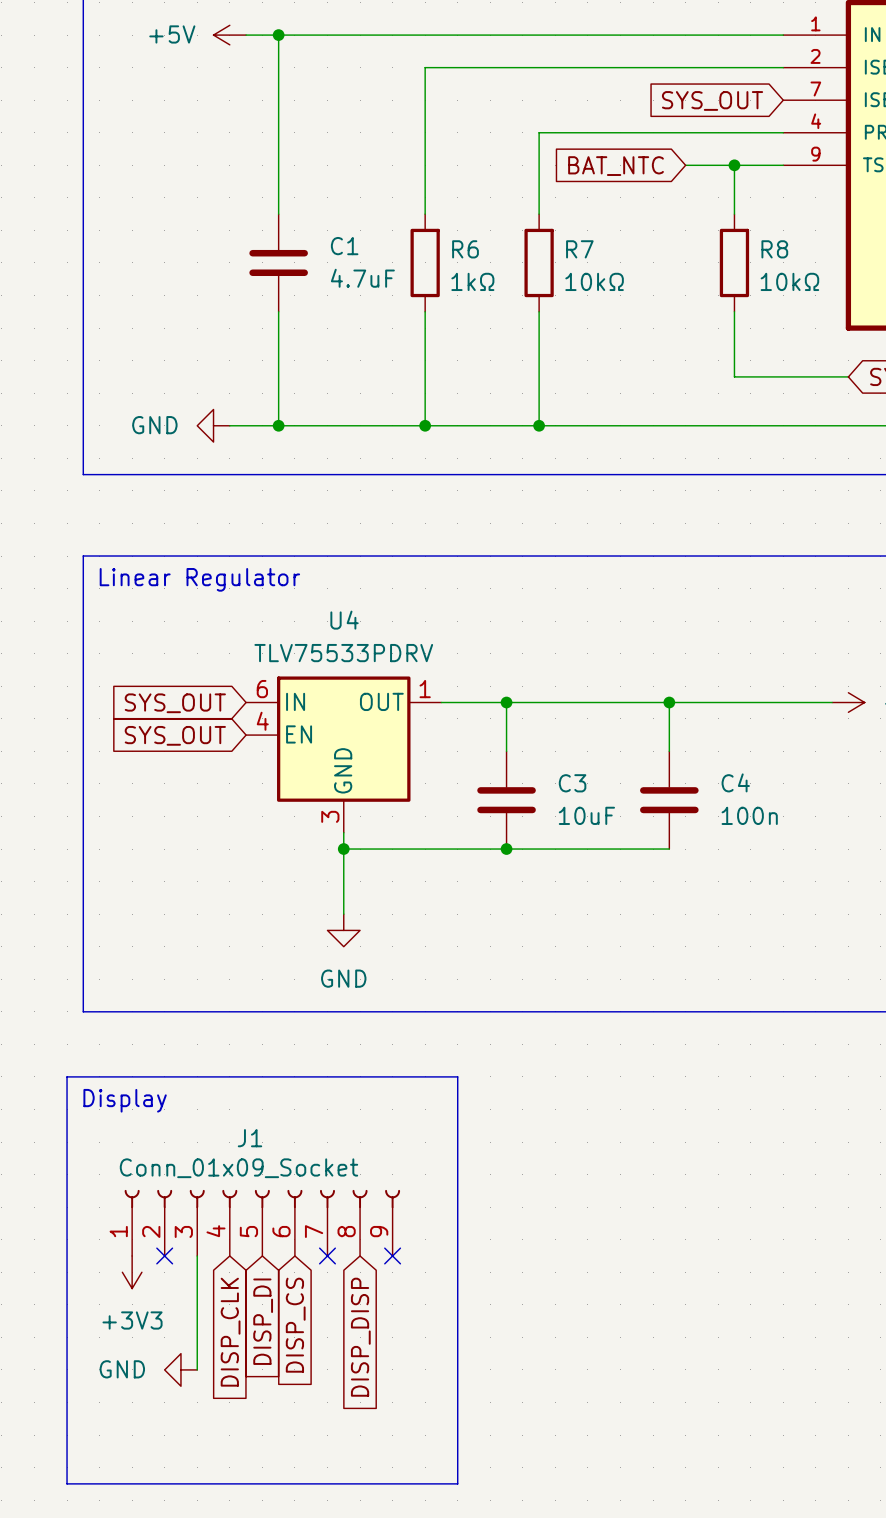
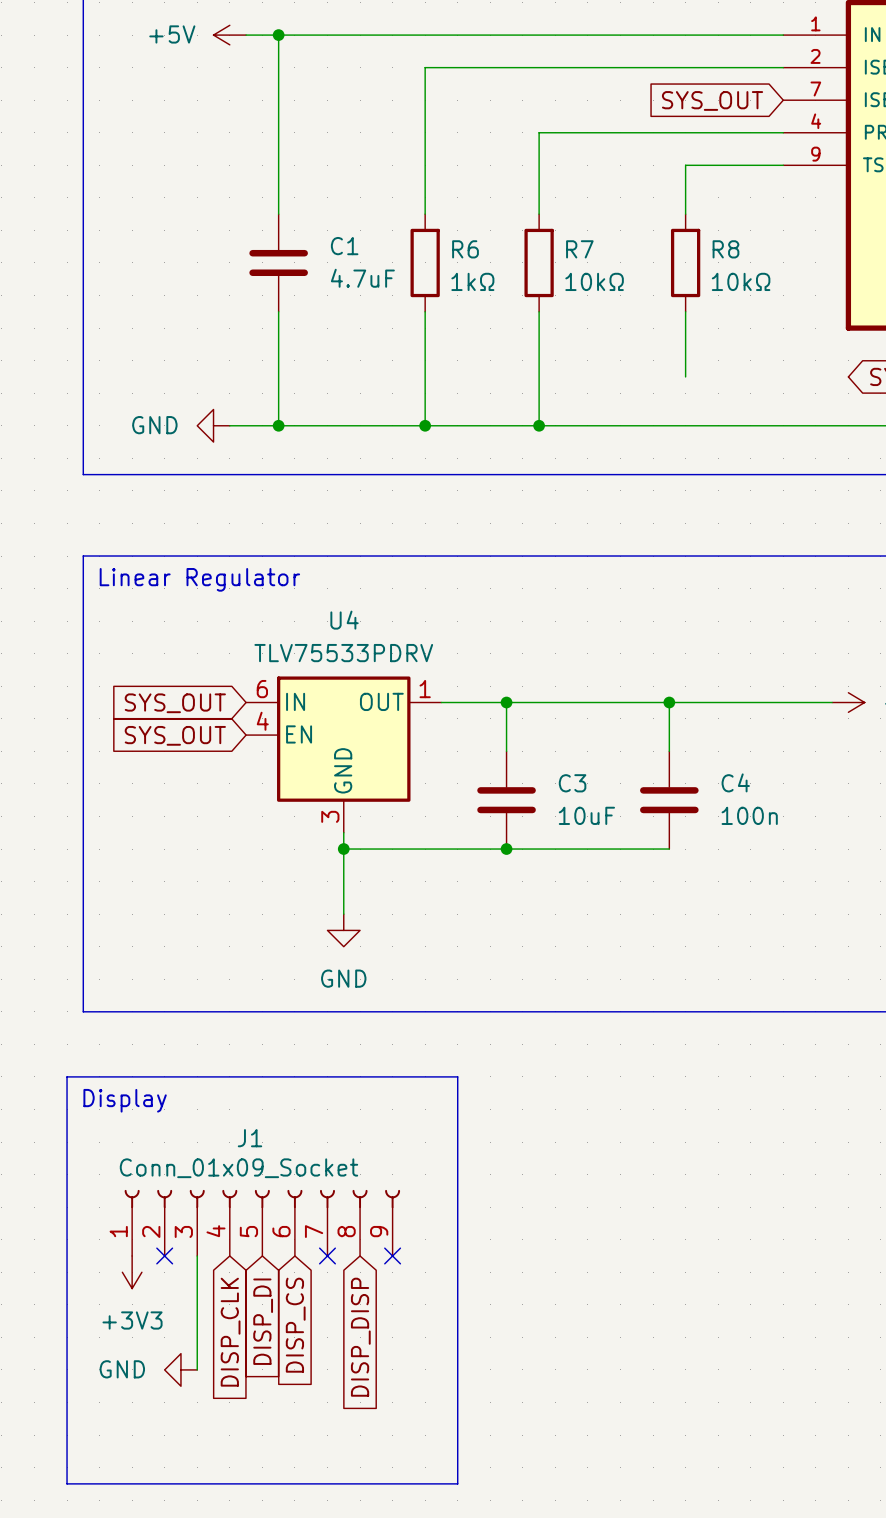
wire: (734, 165) (734, 214) -> (685, 165) (685, 214)
junction: (734, 165) -> none
global label: BAT_NTC (616, 166) -> none
R8 position: (734, 262) -> (685, 262)
wire: none -> (685, 311) (685, 376)
wire: (734, 311) (734, 376) (848, 376) -> none

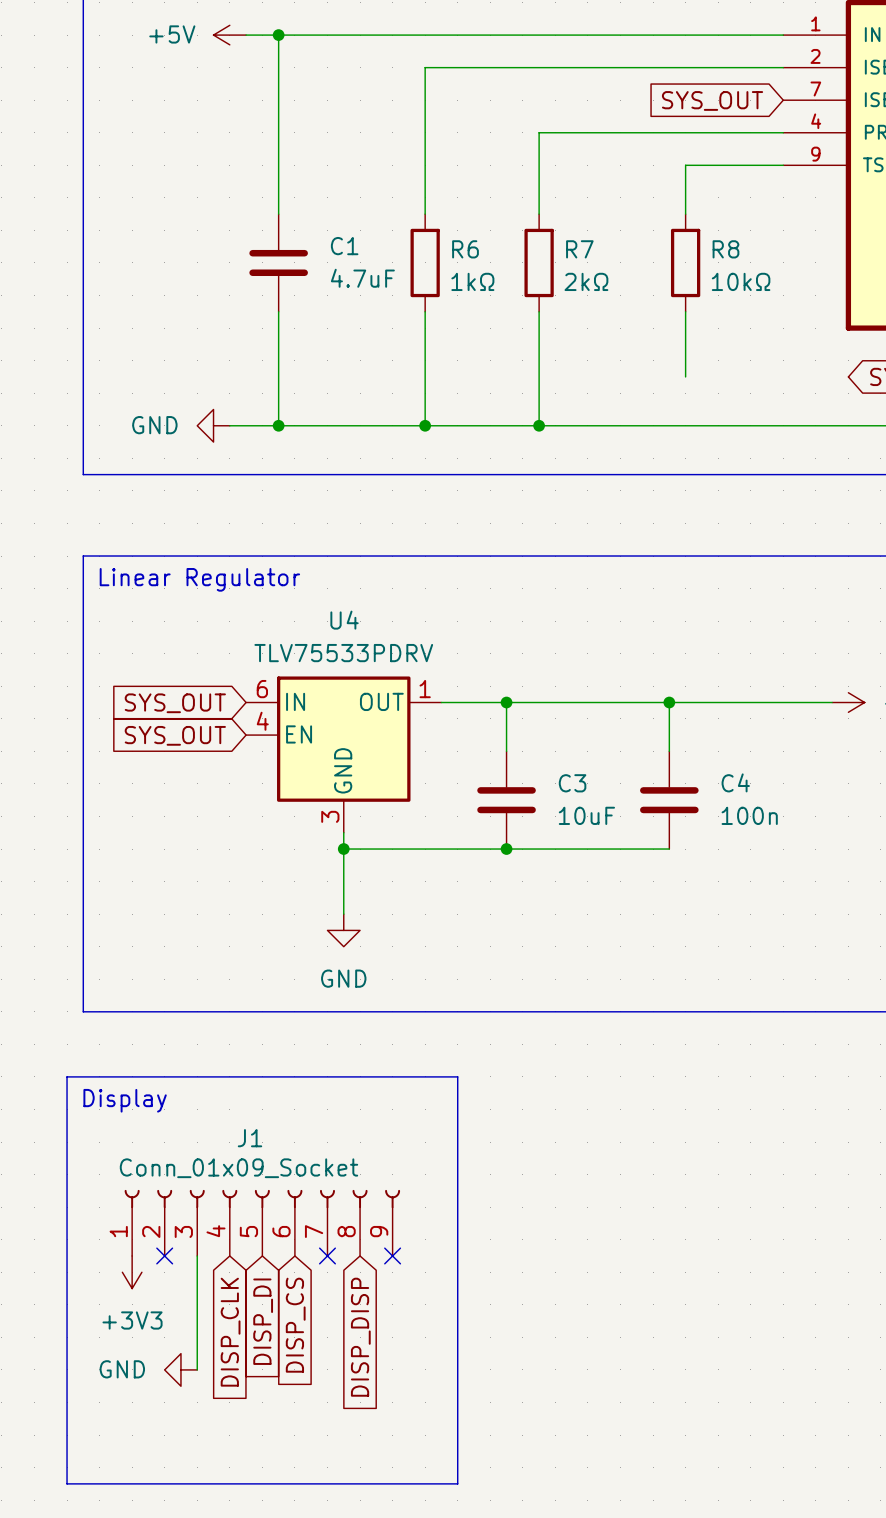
R7 value: 10kΩ (594, 281) -> 2kΩ (586, 281)

